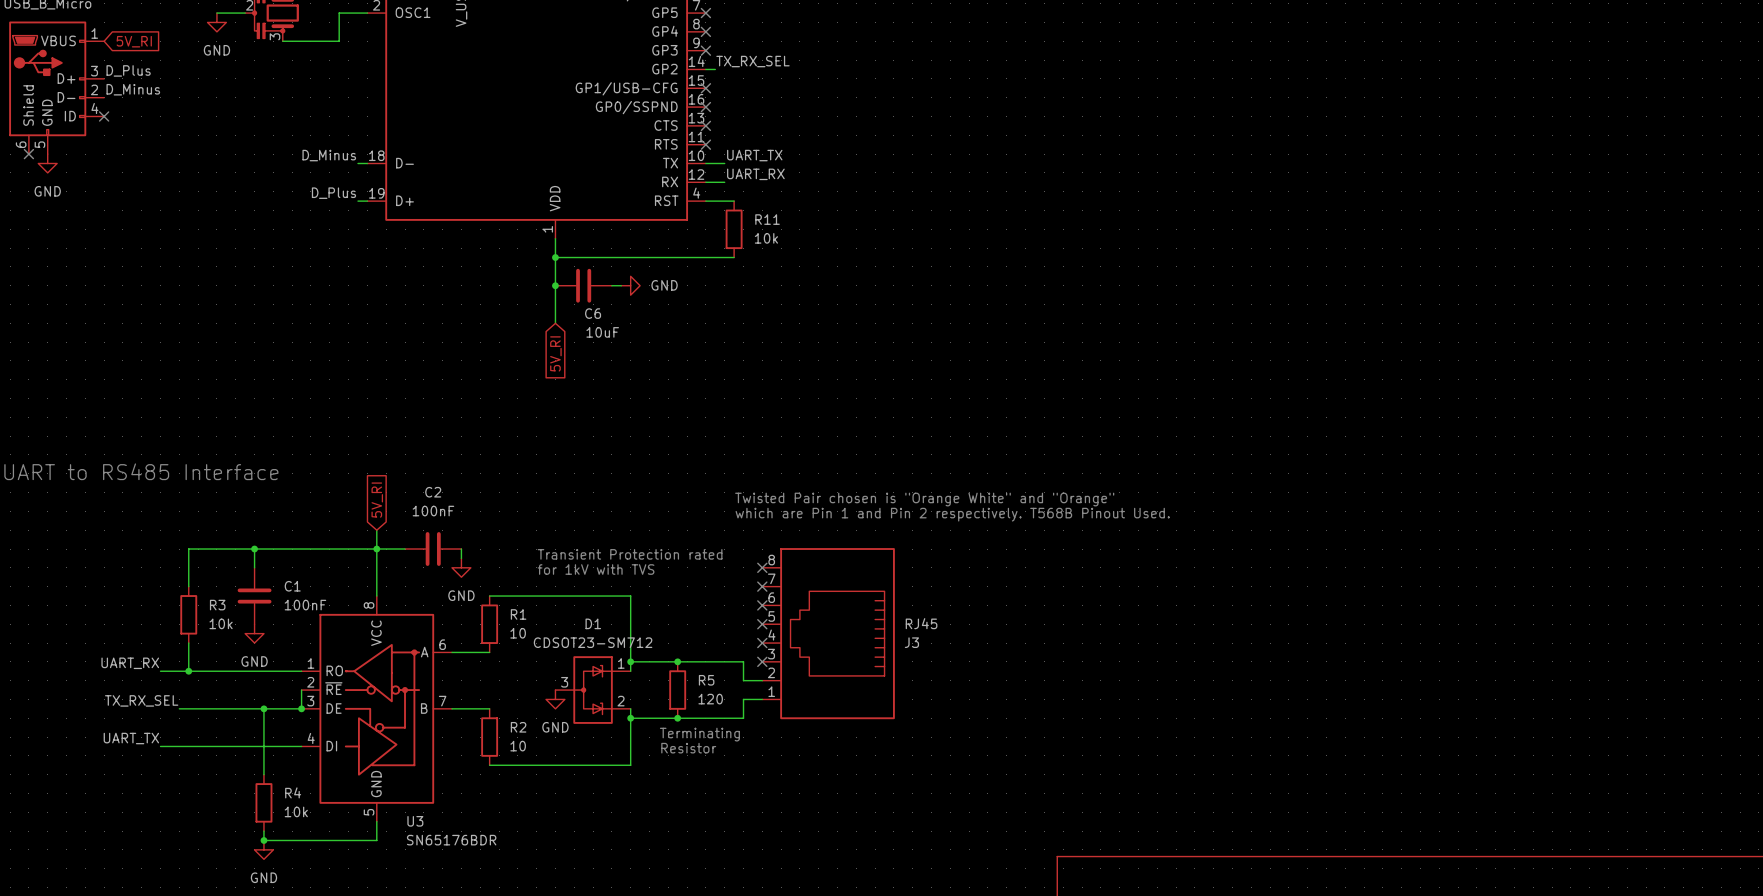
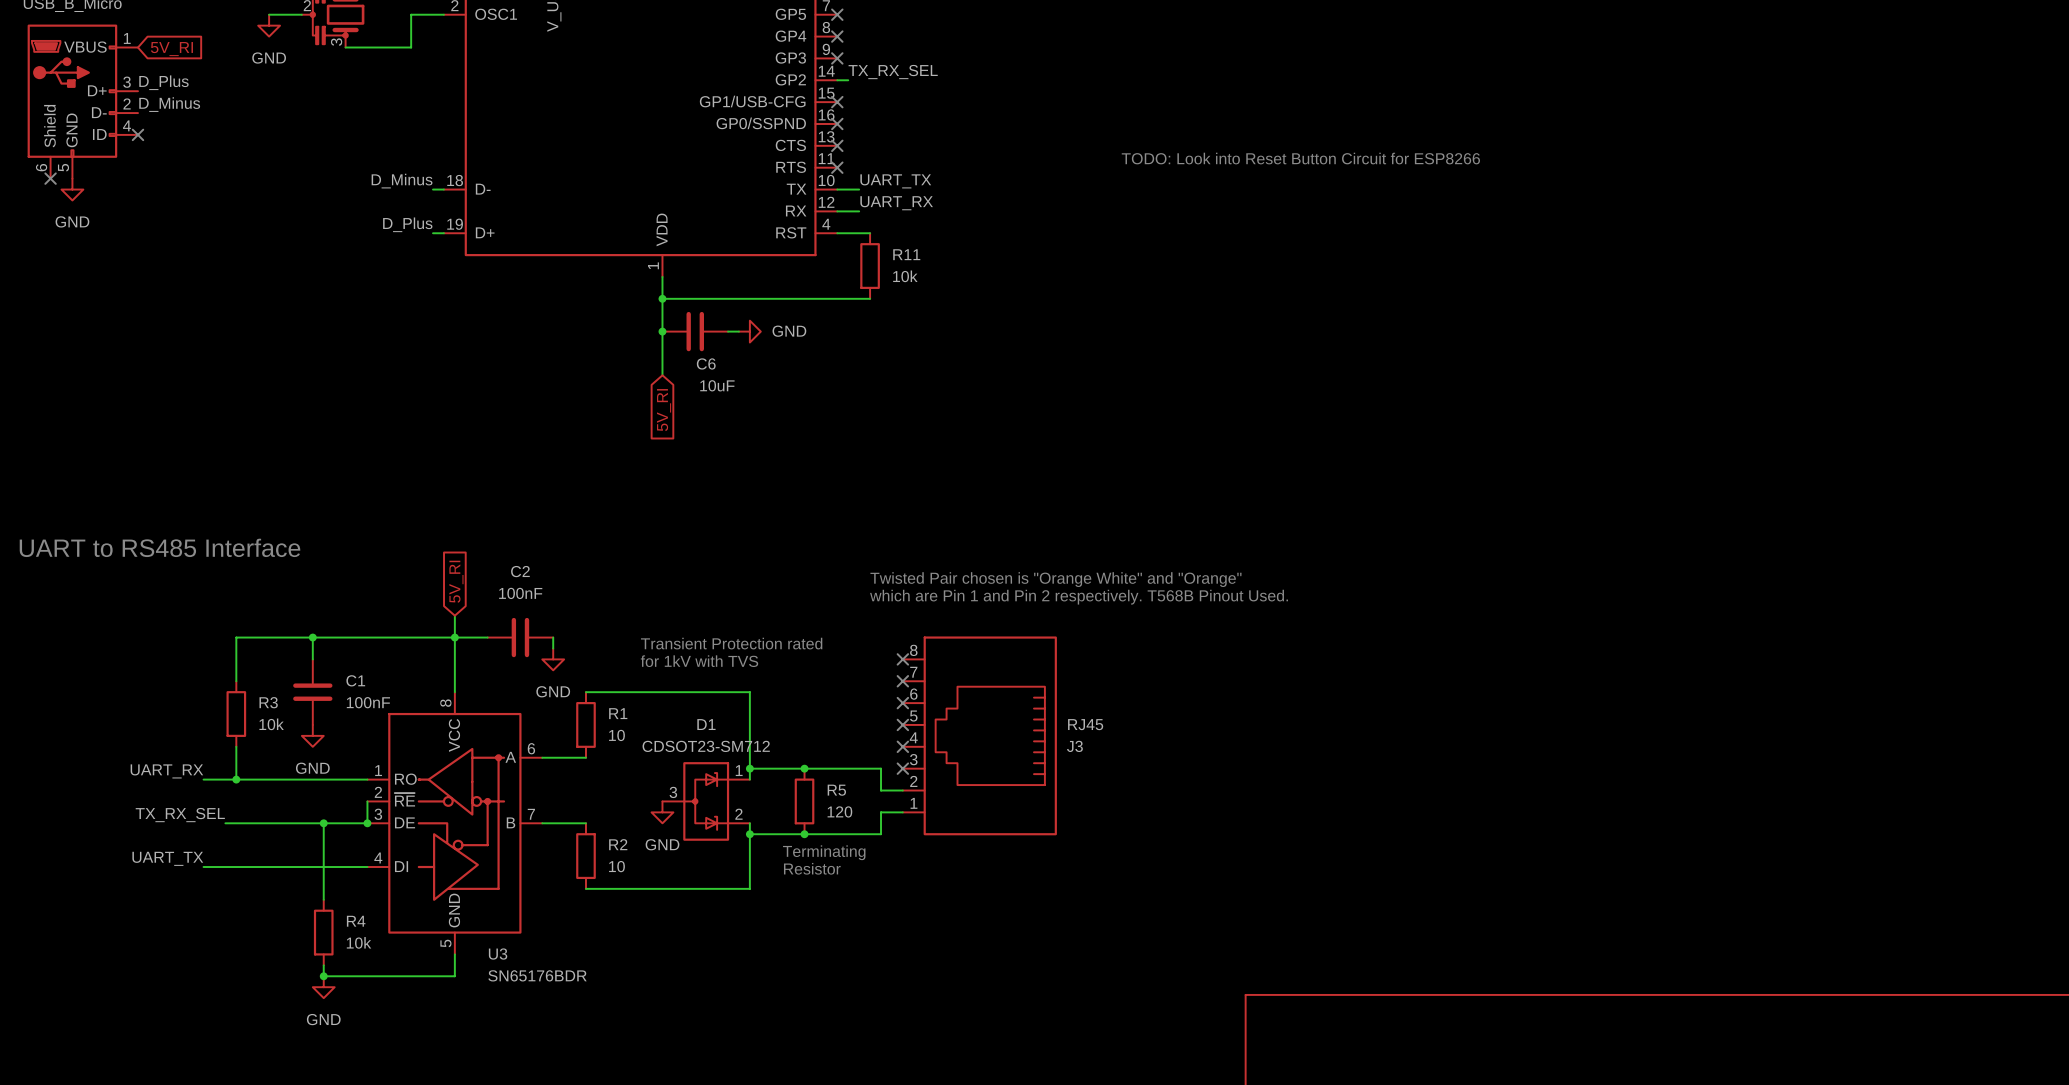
text: none -> TODO: Look into Reset Button Circuit for ESP8266 (1300, 158)

